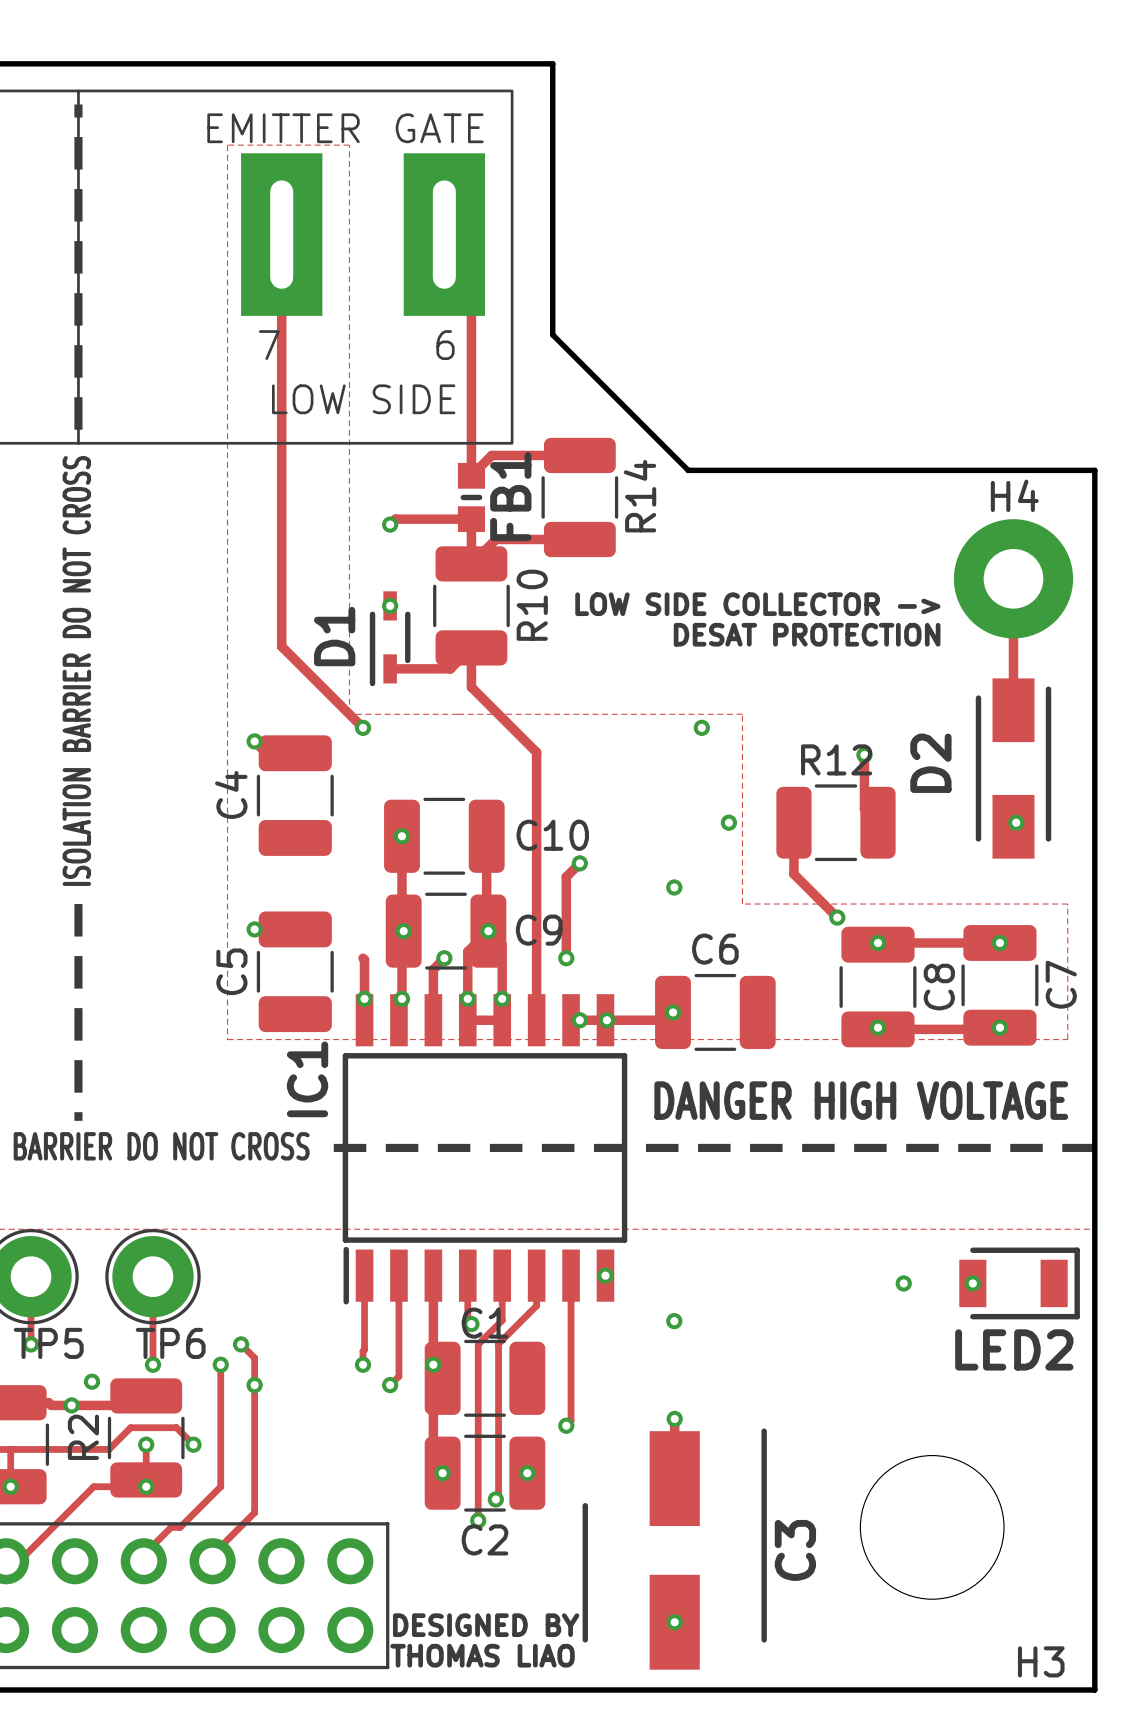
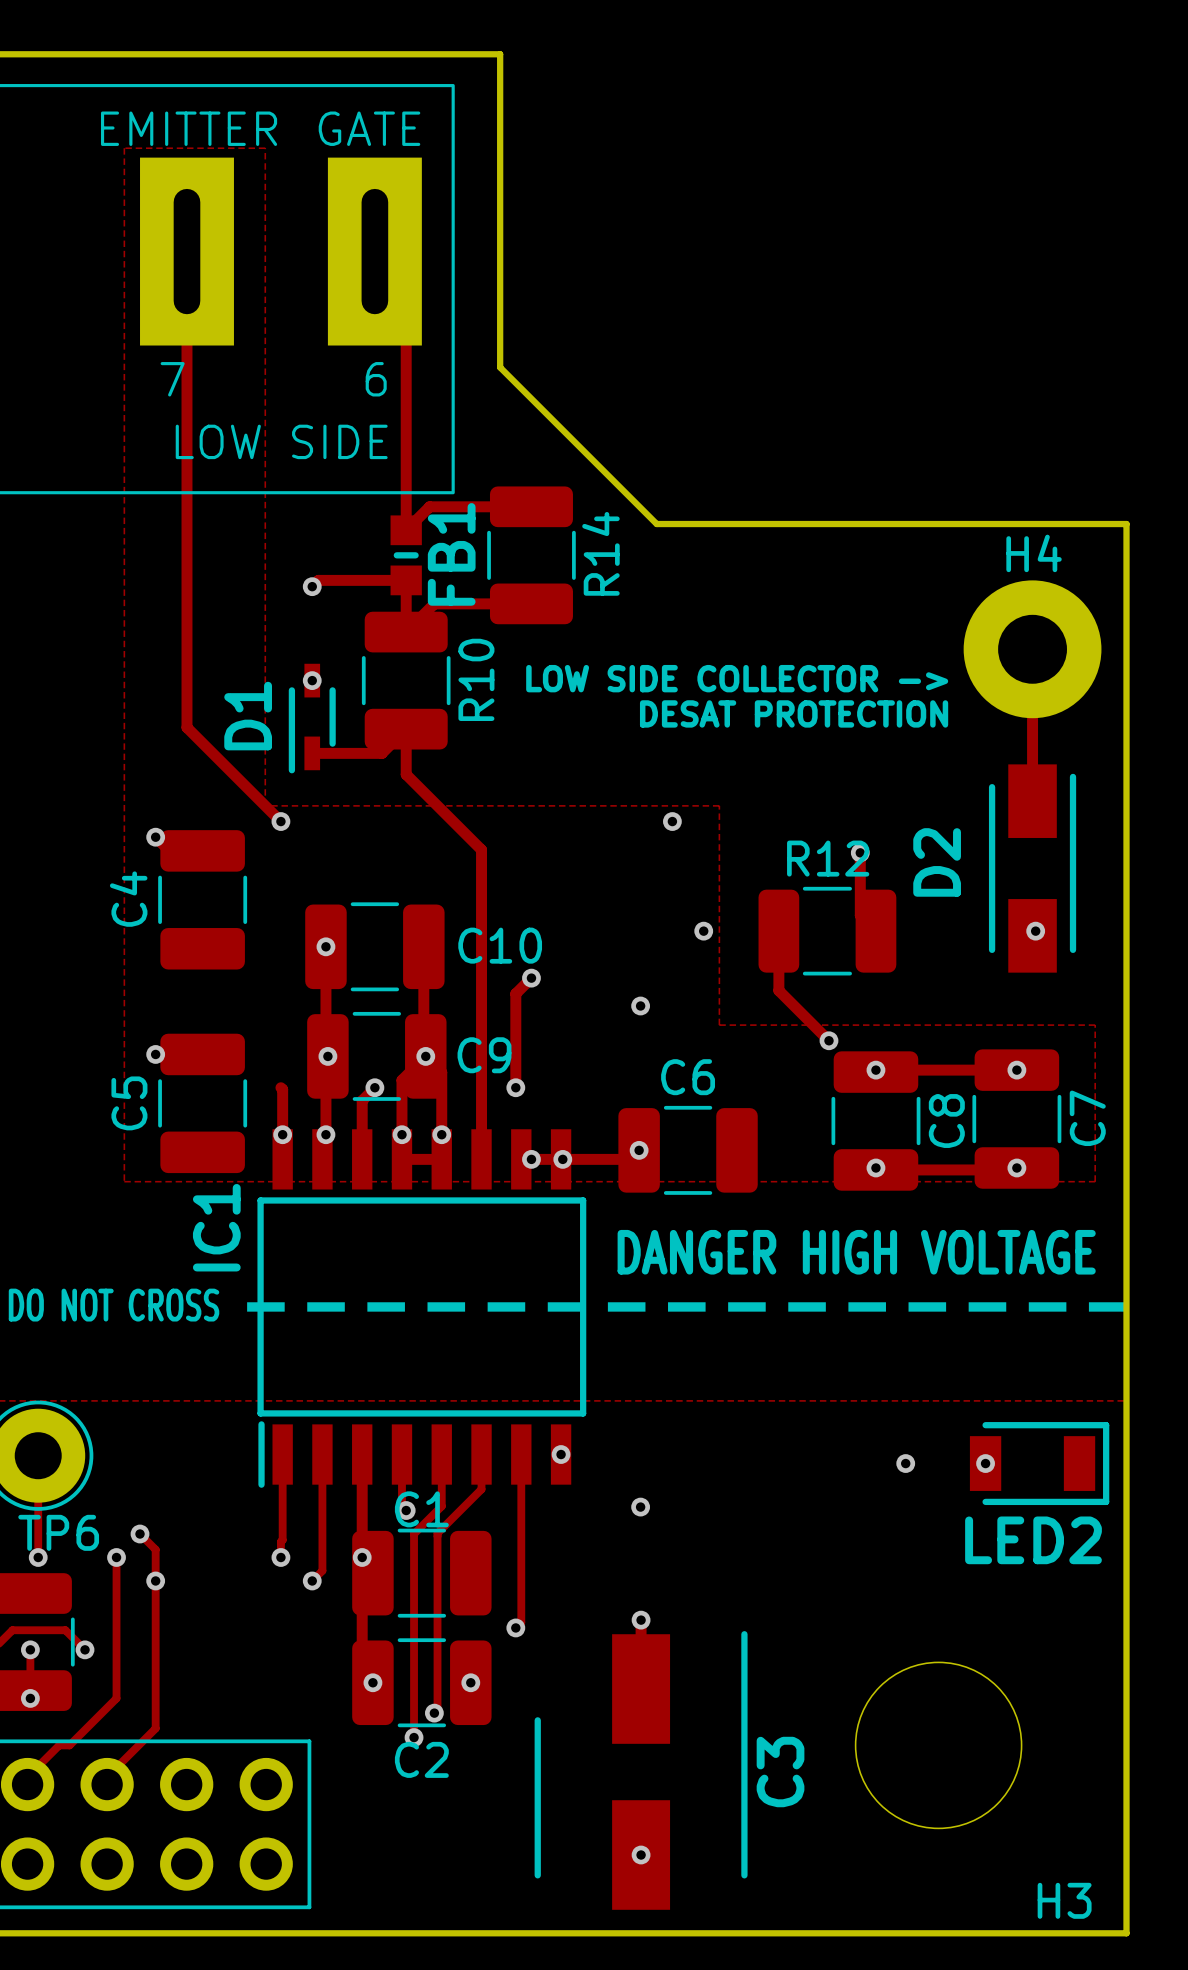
text: DESIGNED BY (486, 1625) -> none
text: THOMAS LIAO (482, 1655) -> none

